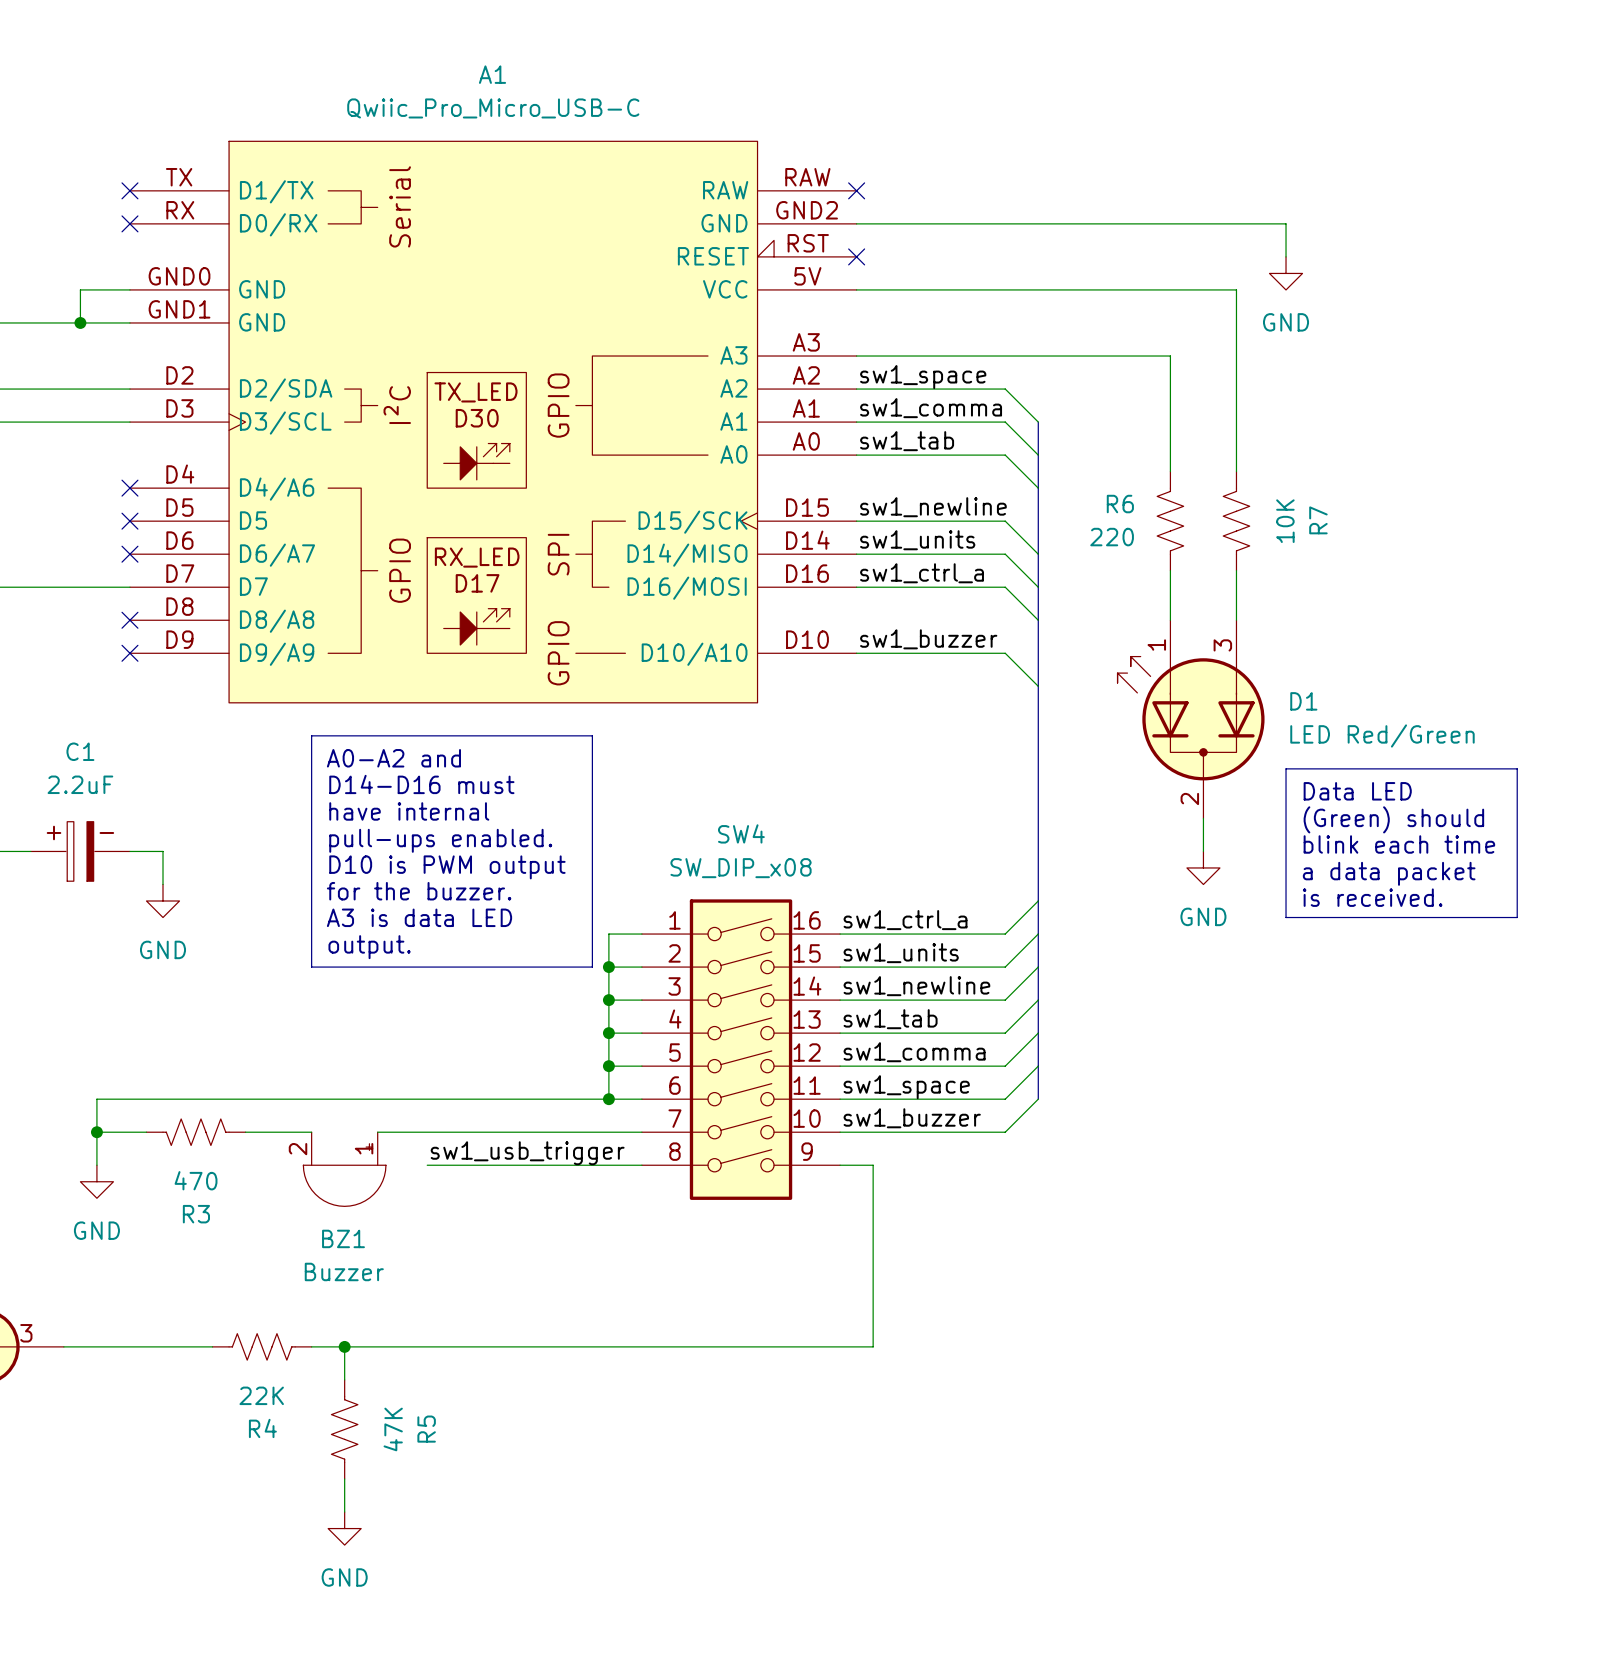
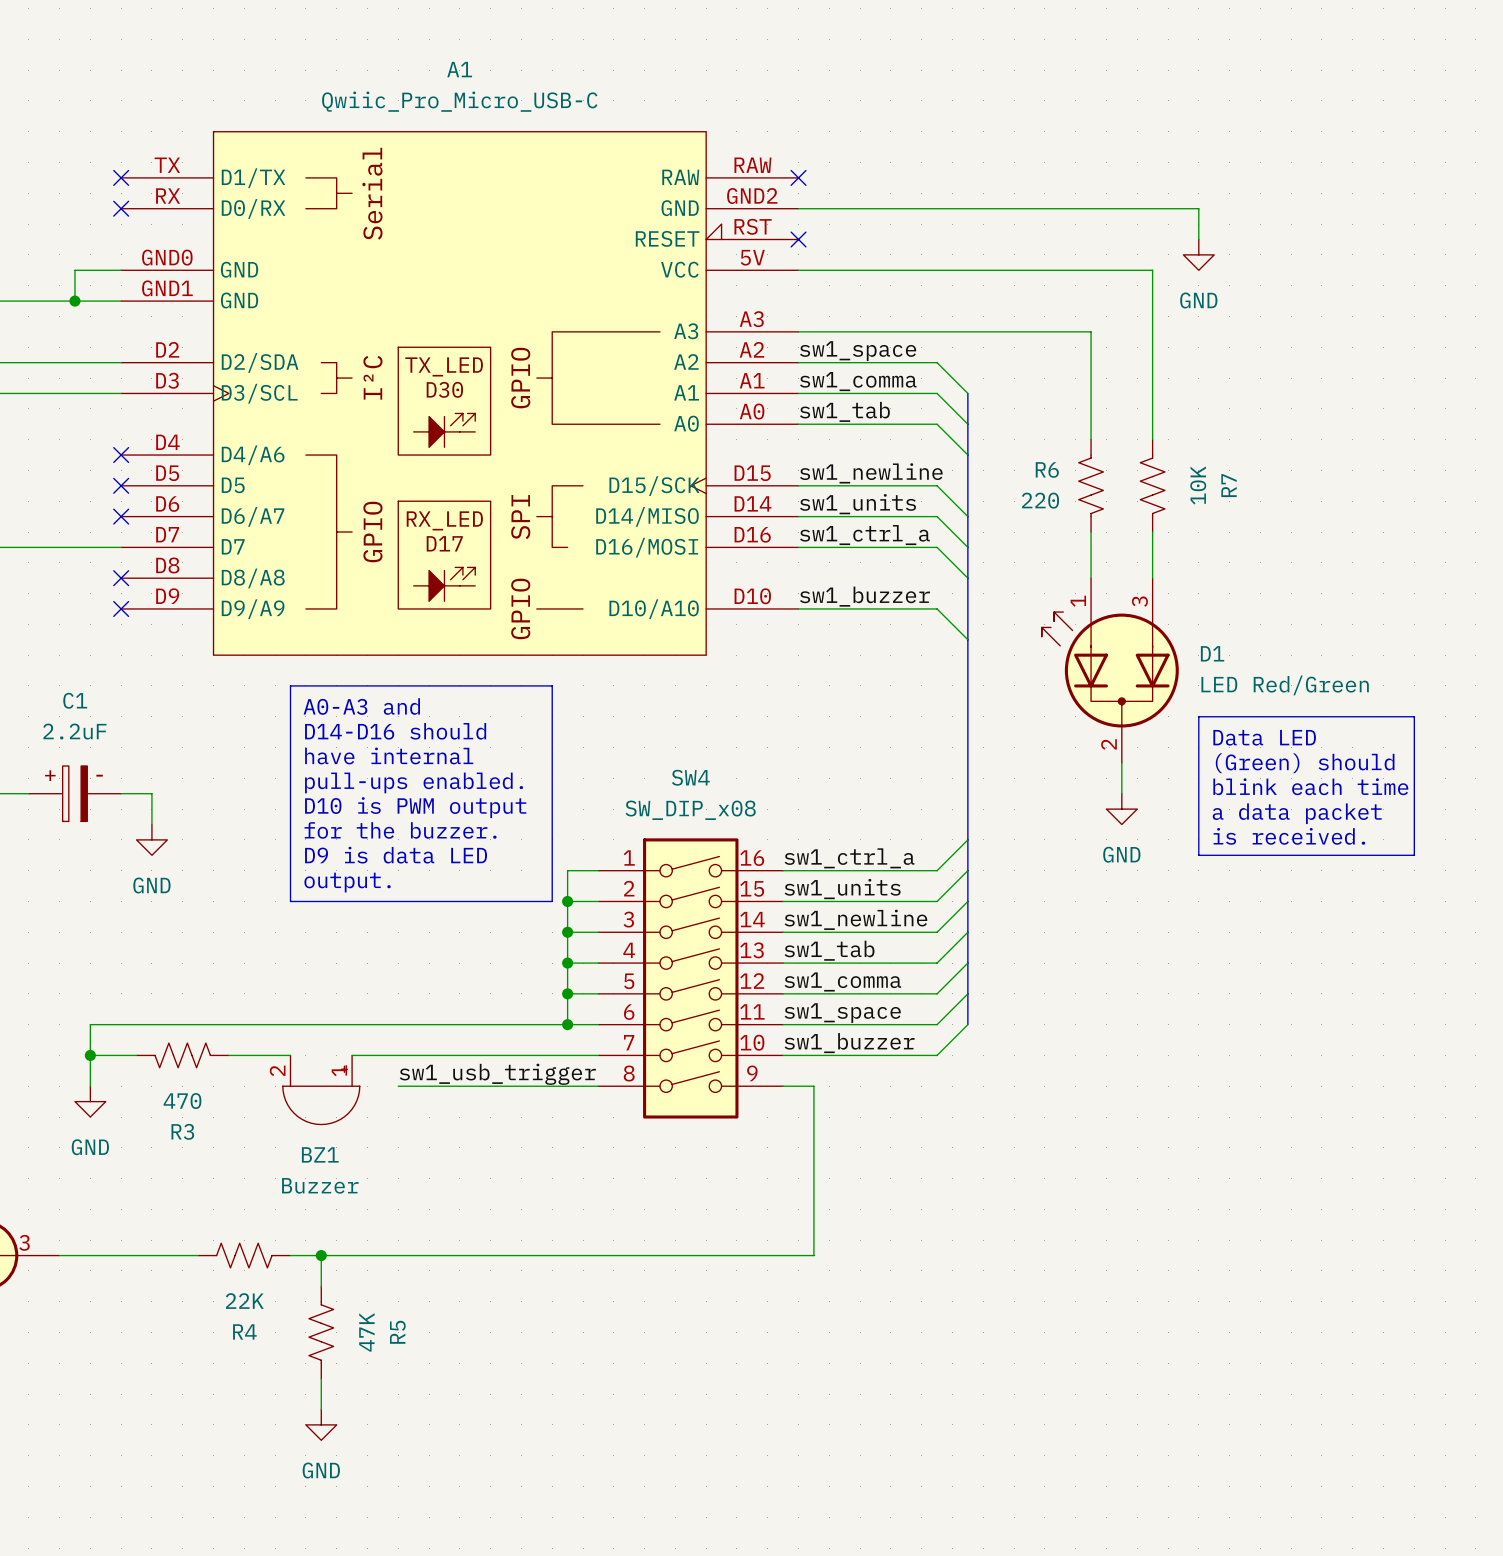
text: A0-A2 and (393, 758) -> A0-A3 and (361, 706)
text: D14-D16 must (421, 784) -> D14-D16 should (395, 731)
text: A3 is data LED (419, 917) -> D9 is data LED (396, 855)

